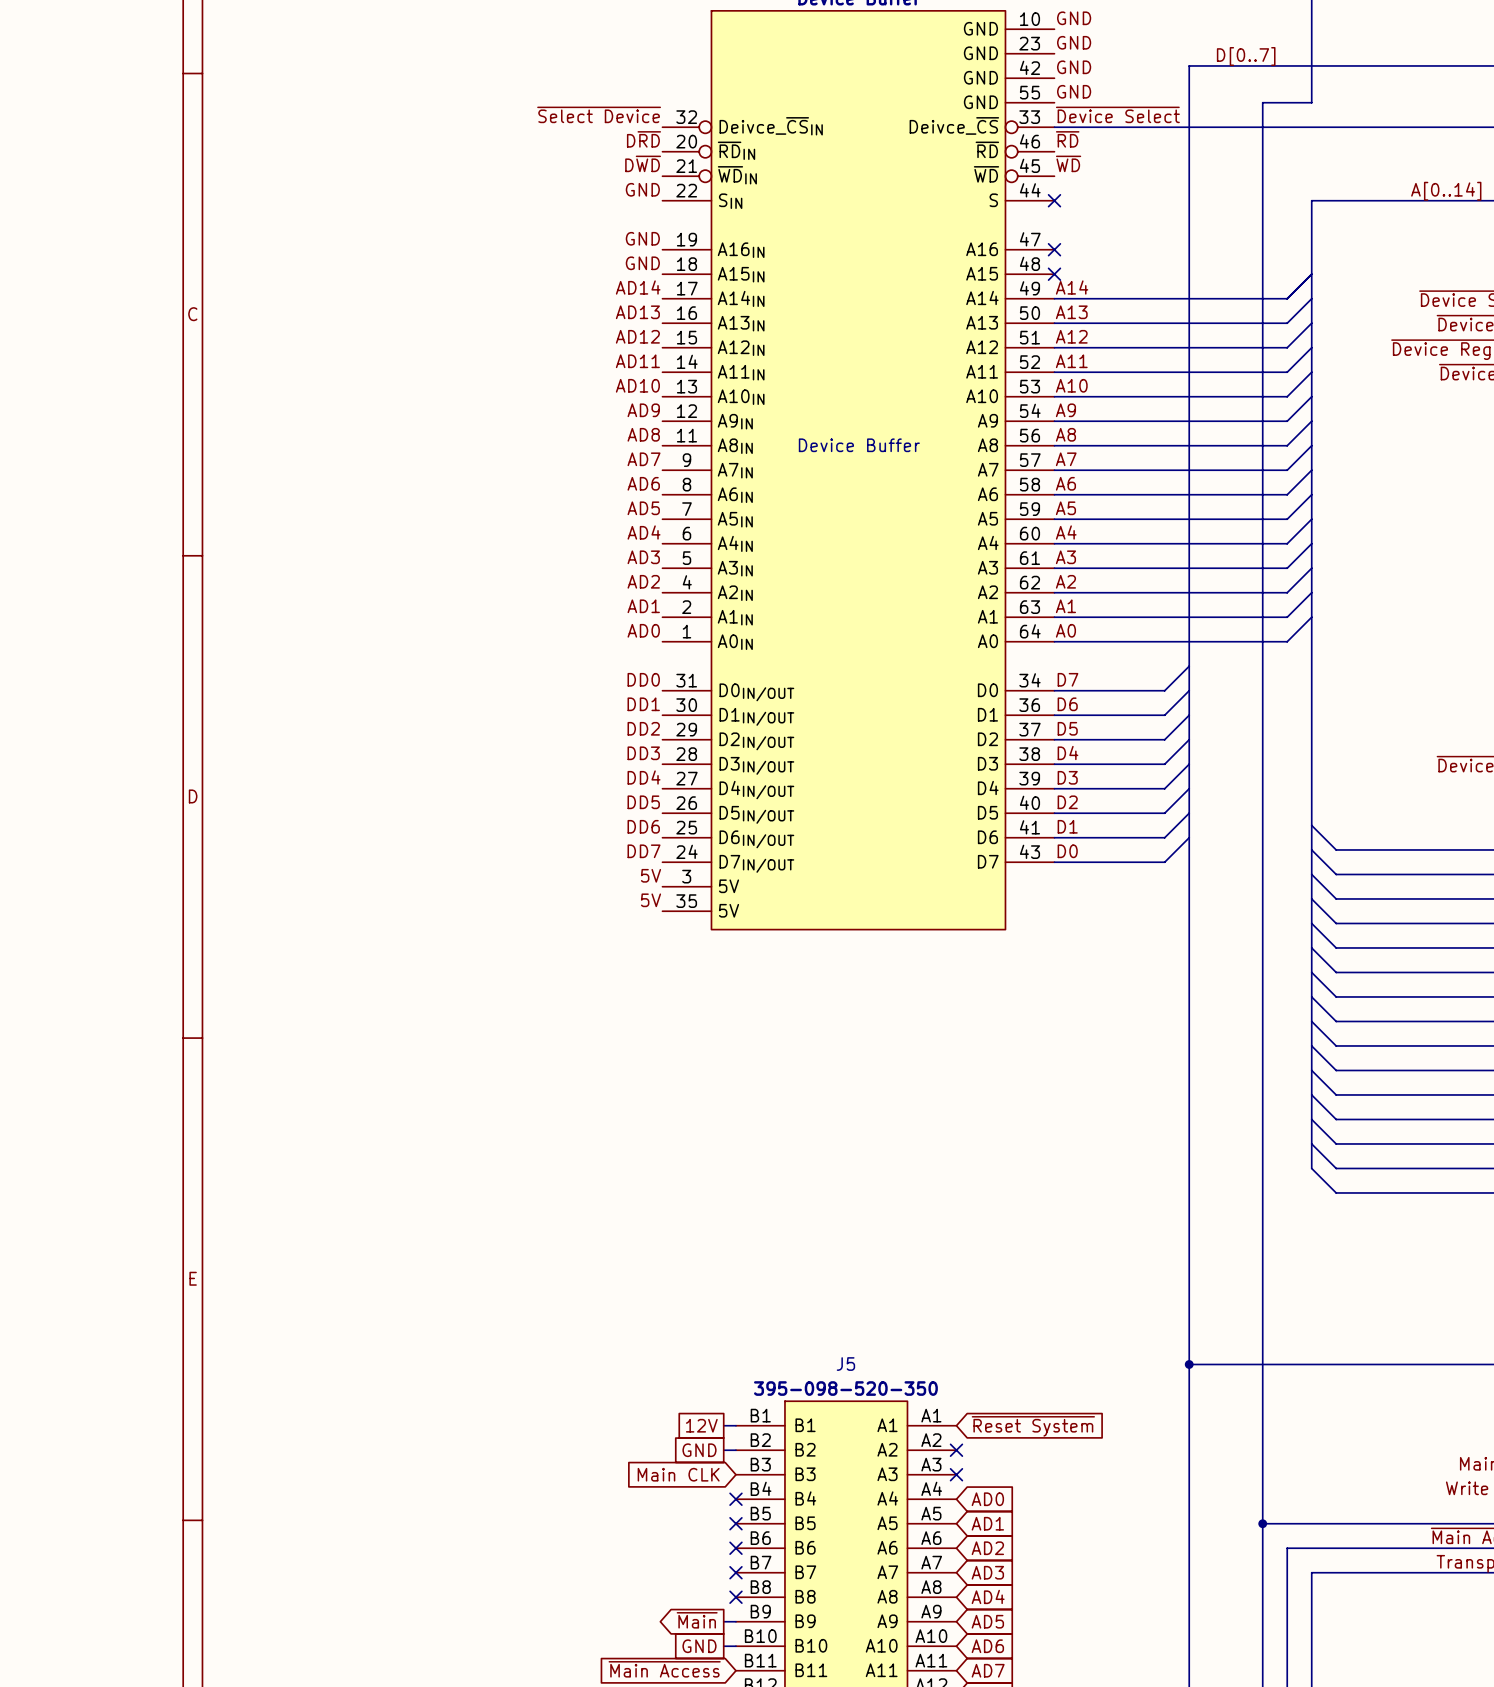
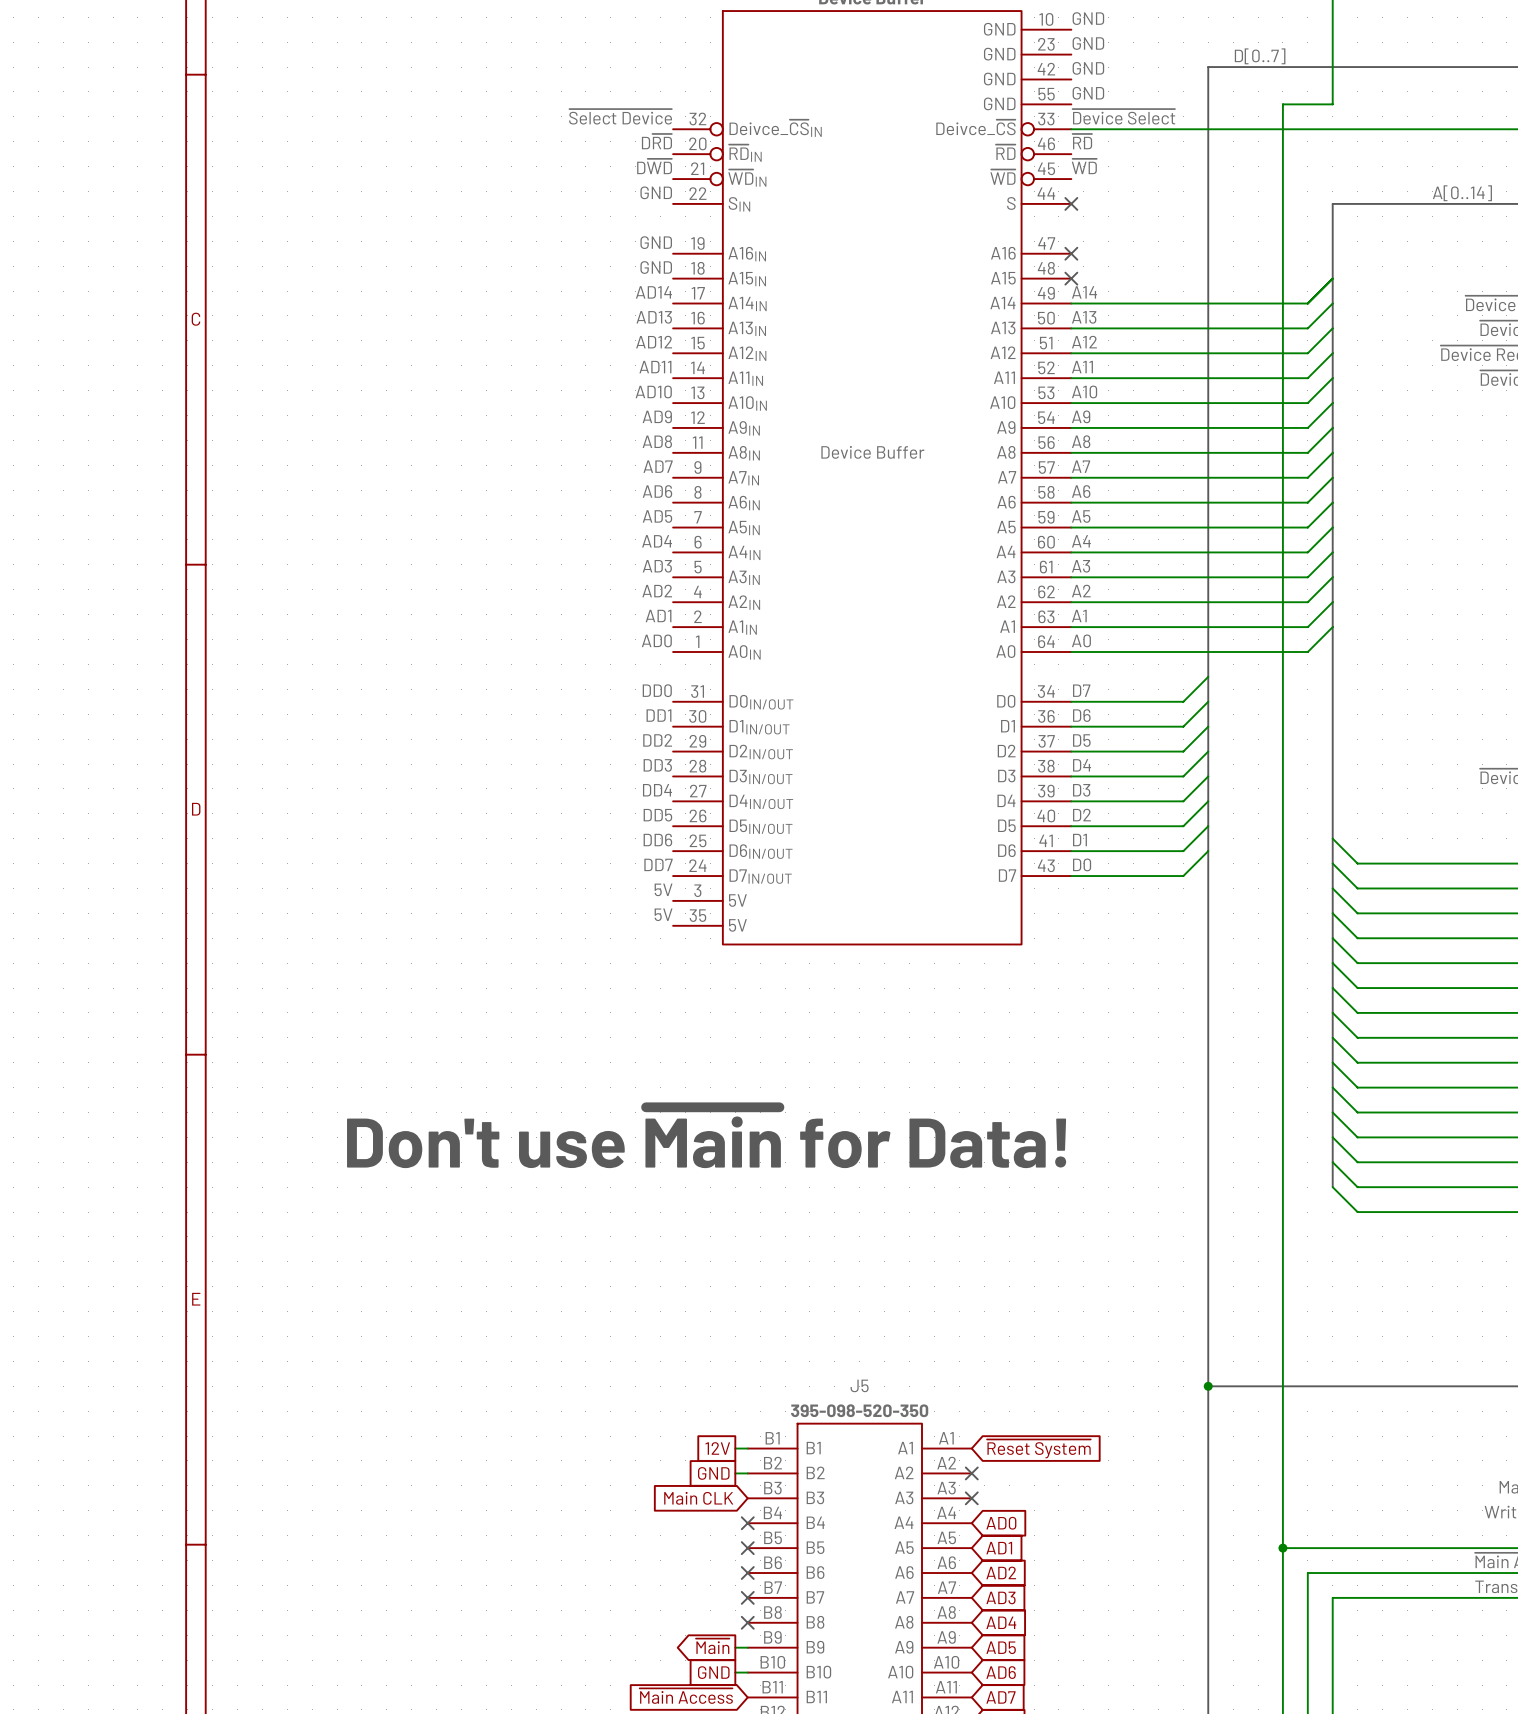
text: none -> Don't use ~{Main} for Data! (706, 1137)

